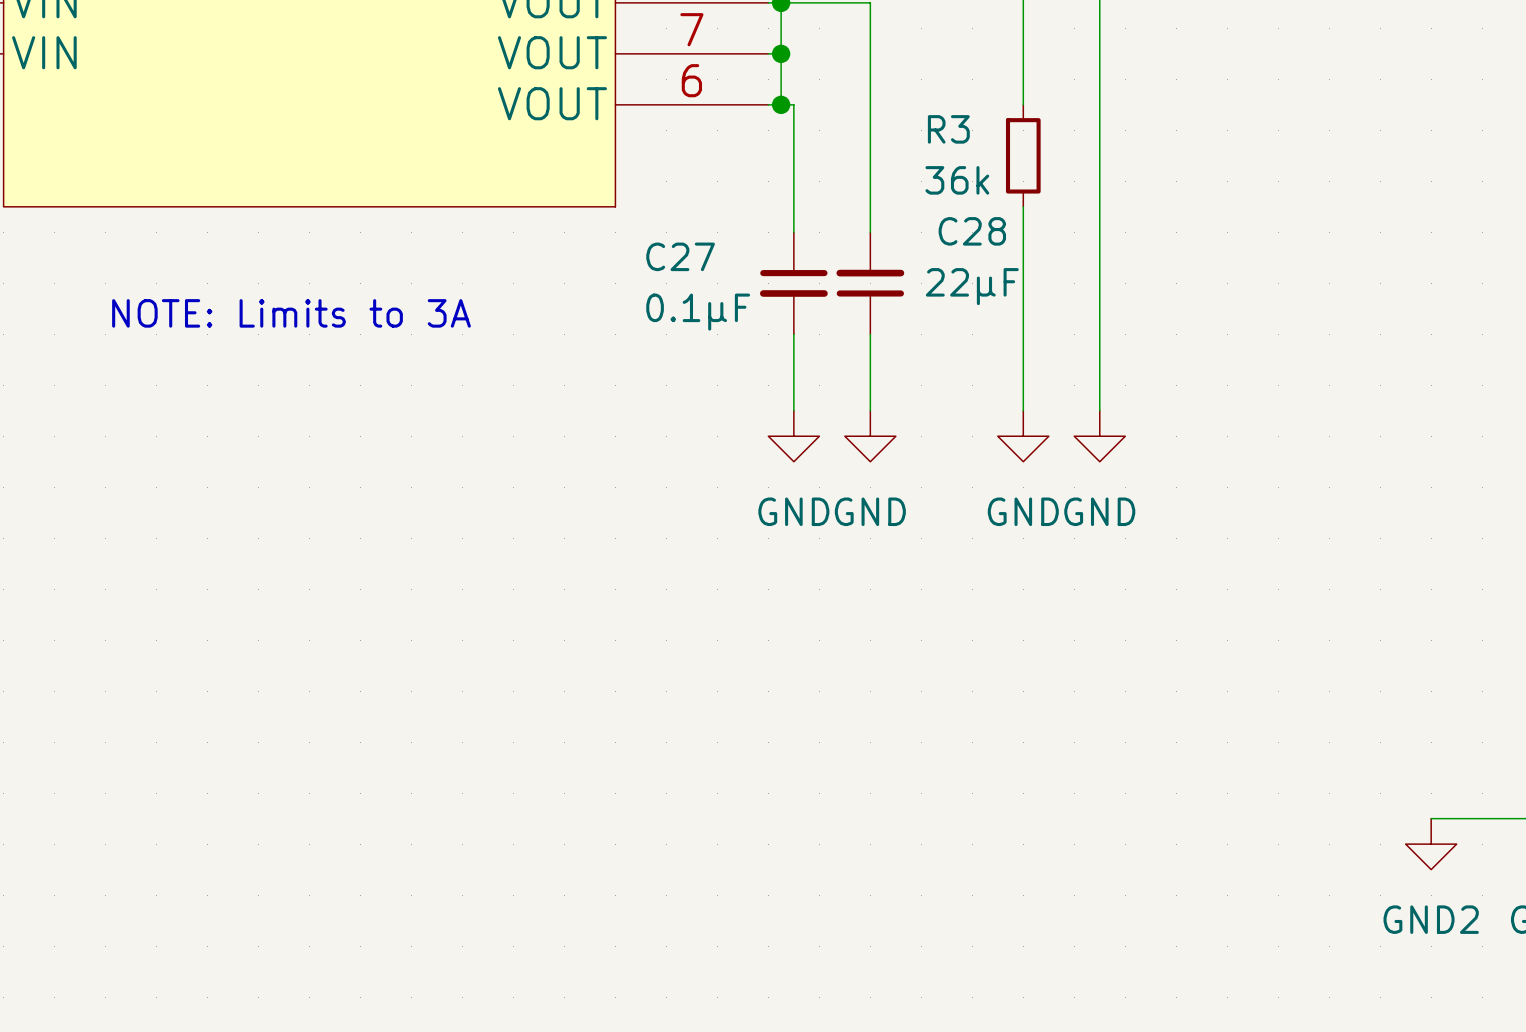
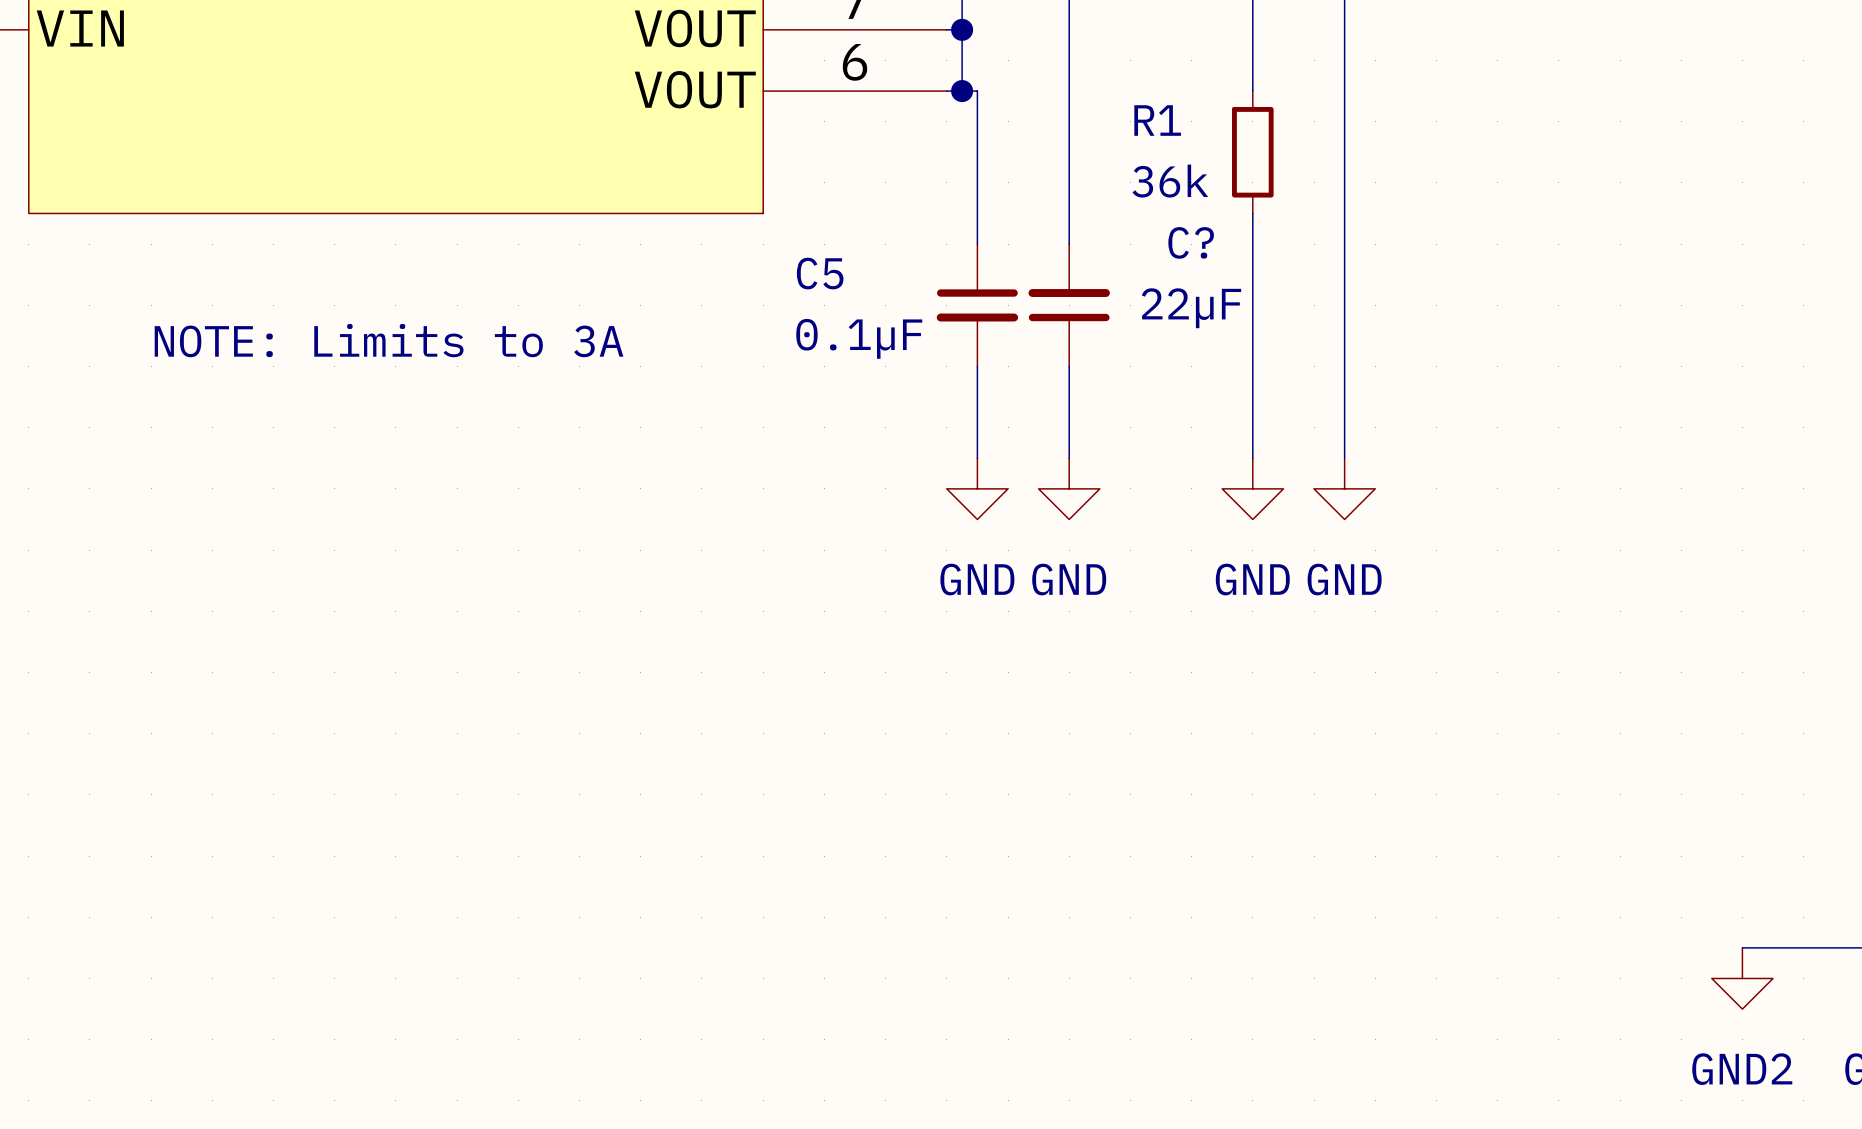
R3 name: R3 (948, 129) -> R1 (1157, 120)
C28 name: C28 (972, 231) -> C? (1191, 242)
C27 name: C27 (680, 256) -> C5 (820, 273)

